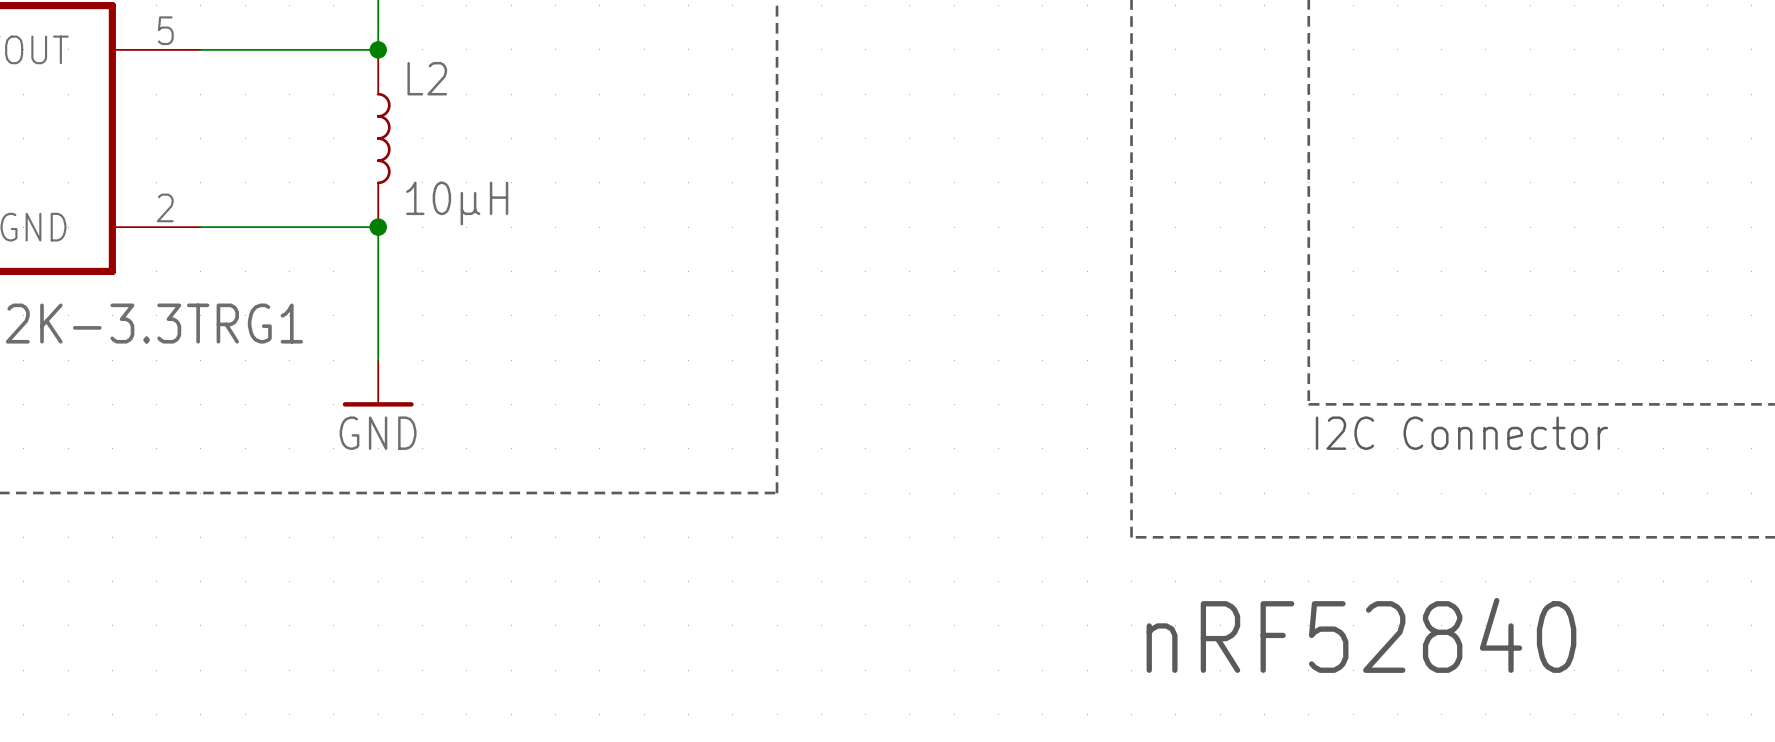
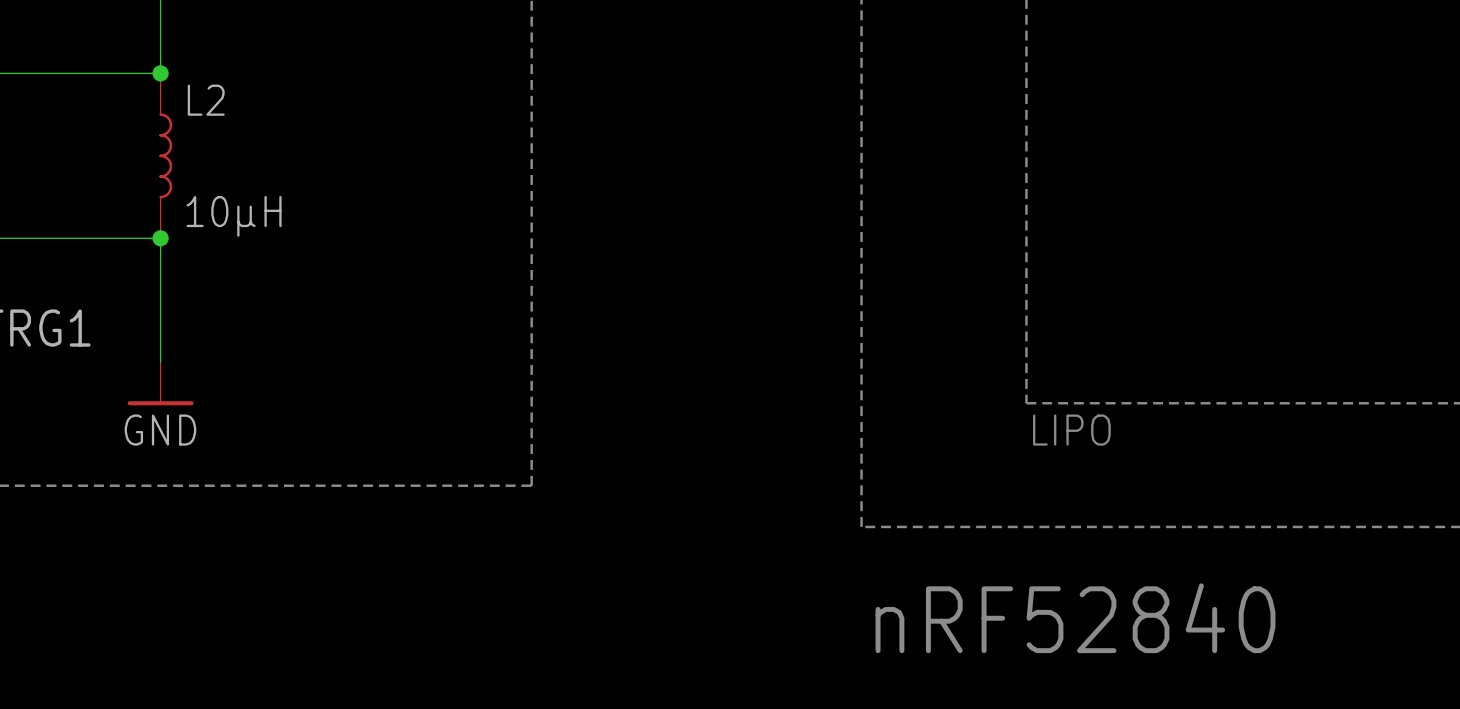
text: I2C Connector (1461, 433) -> LIPO (1071, 430)

